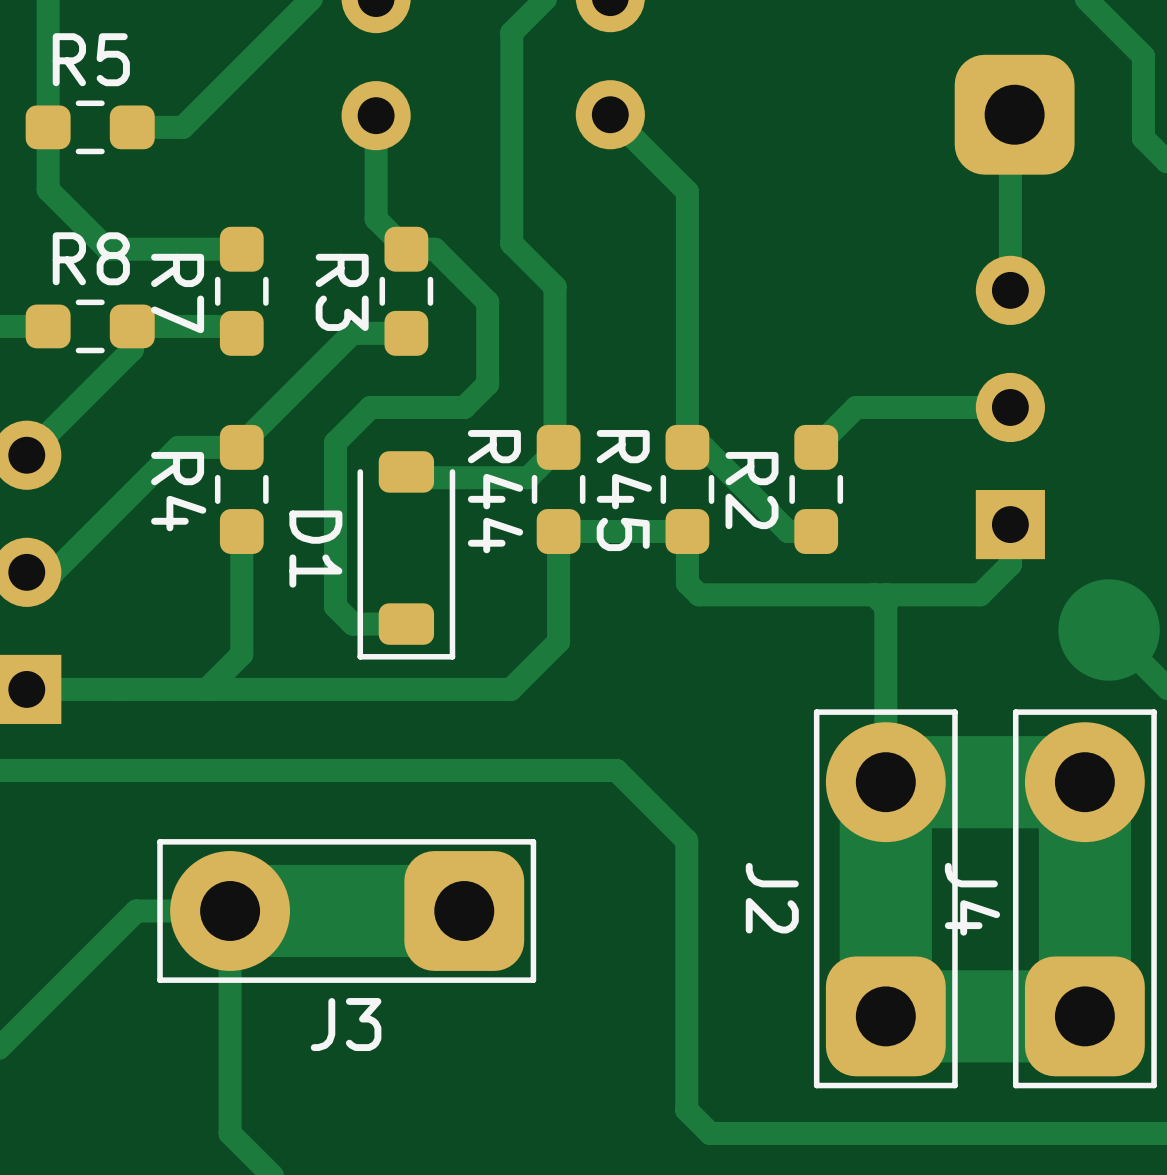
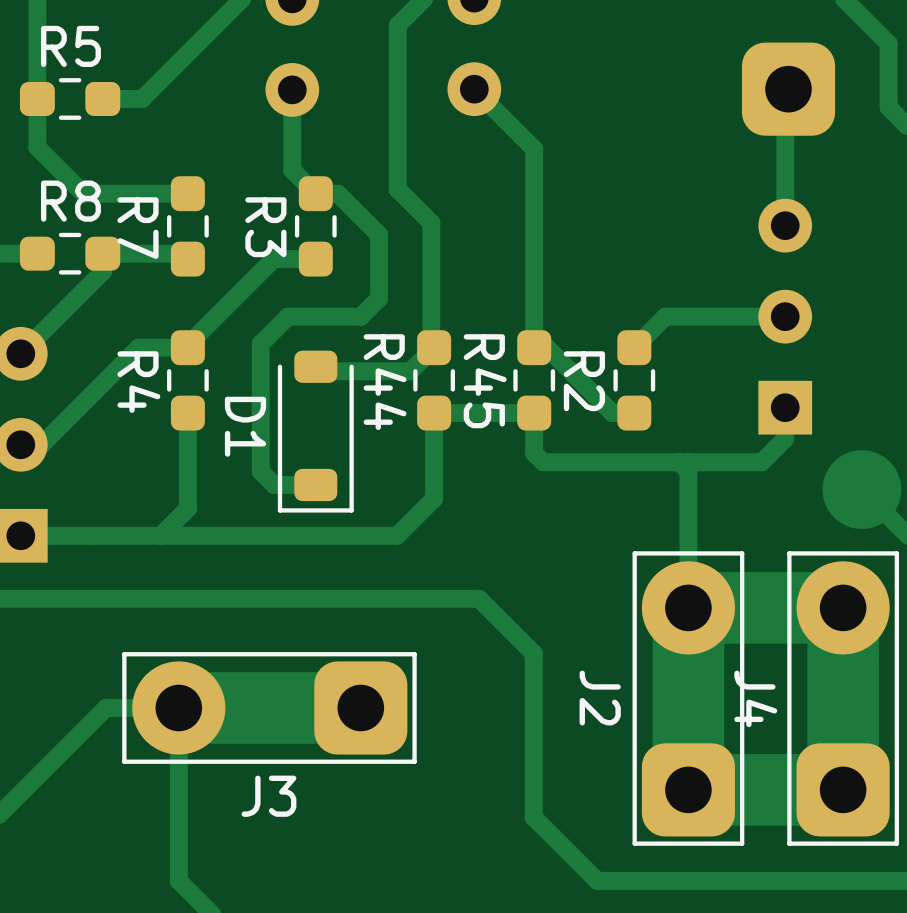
track: (686, 1051) (686, 1110) (710, 1133) (768, 1133) -> (533, 817) (597, 880)

